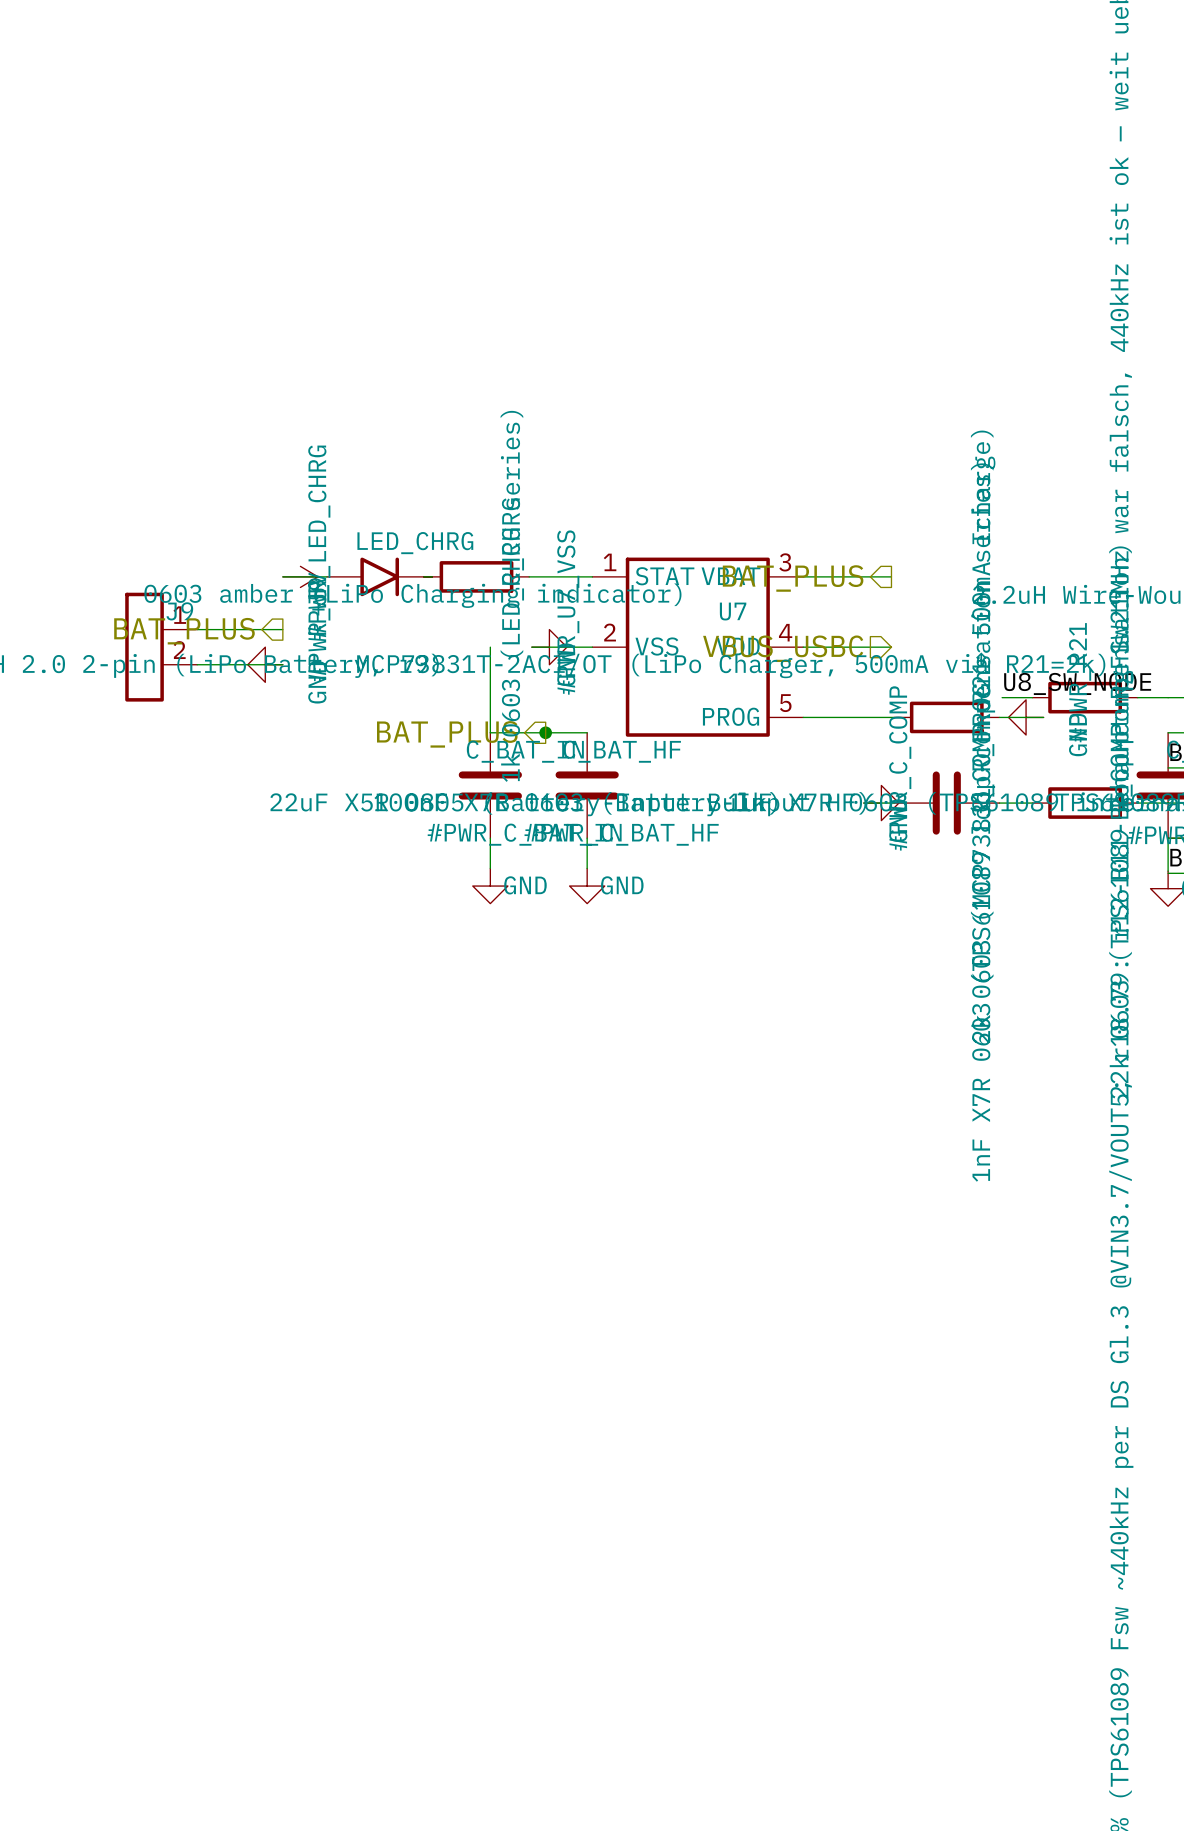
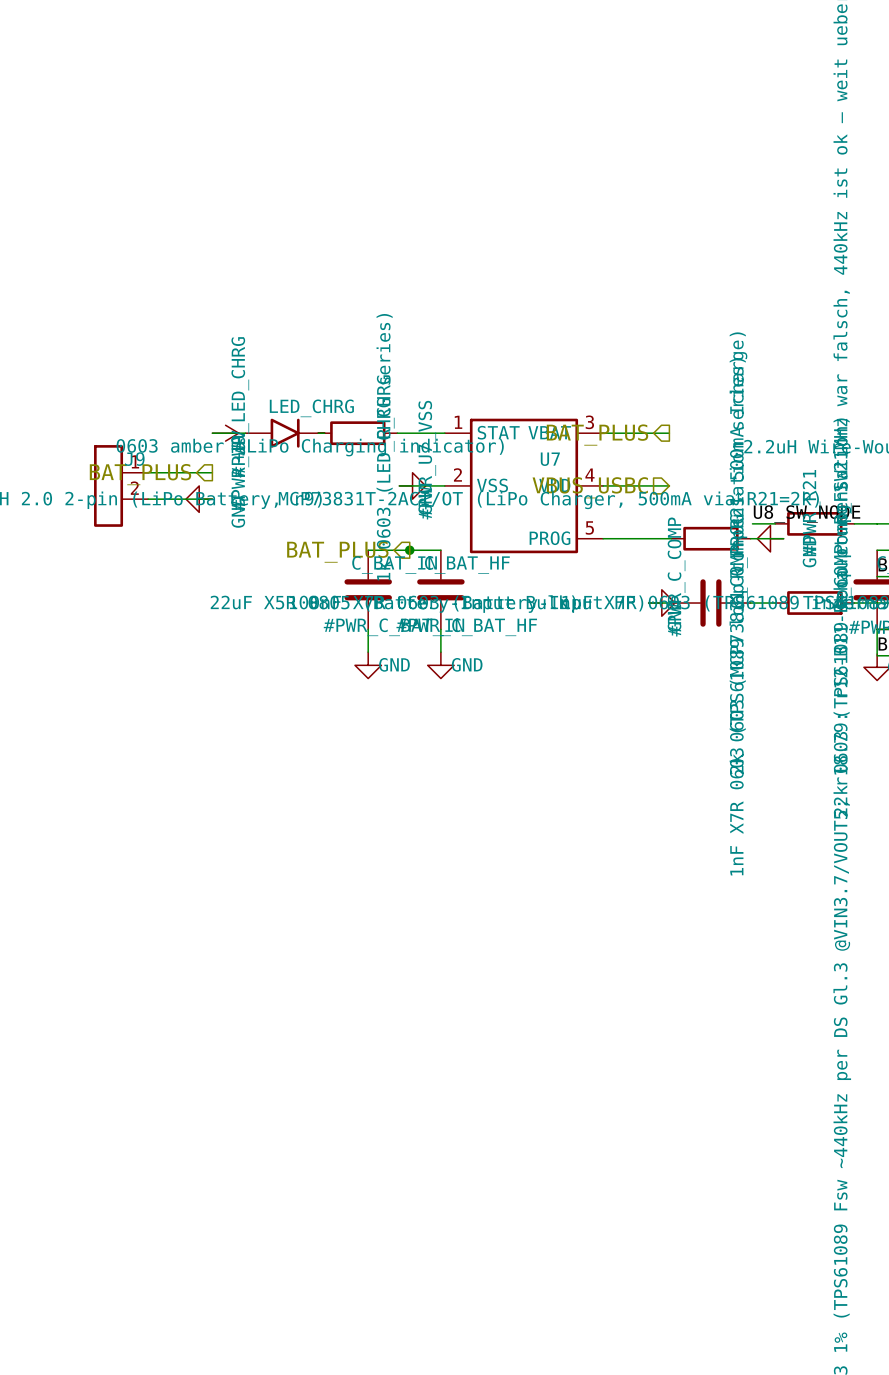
wire: (490, 647) (490, 732) -> none

